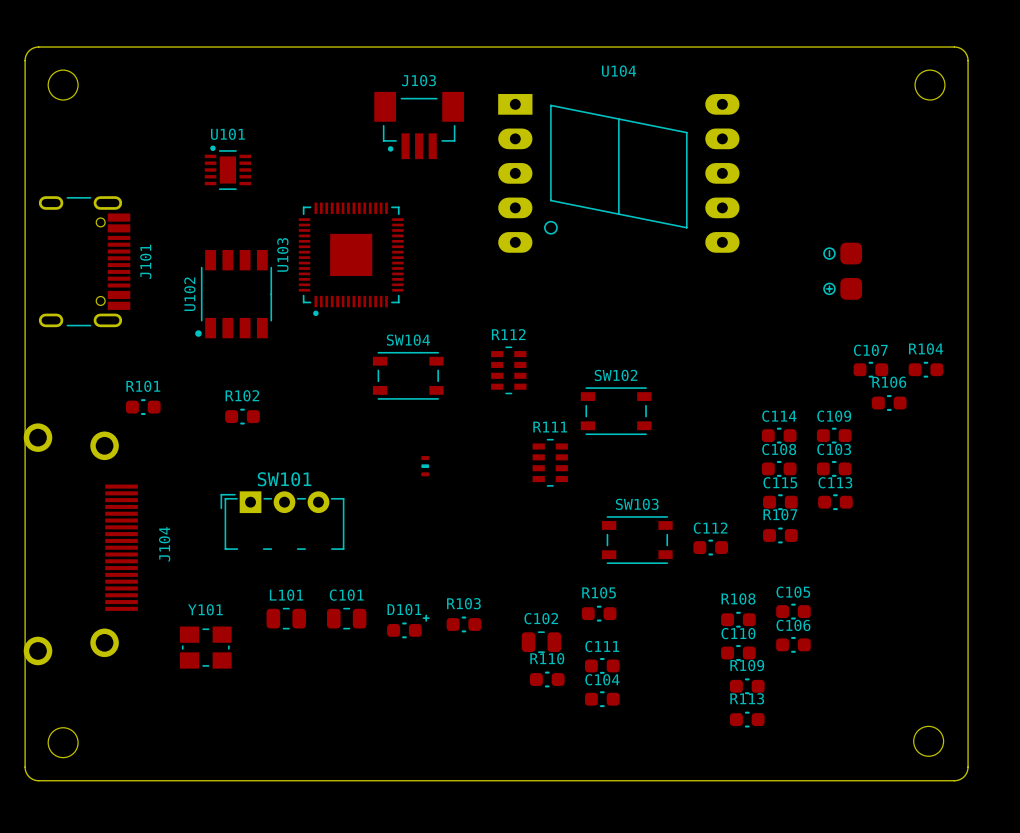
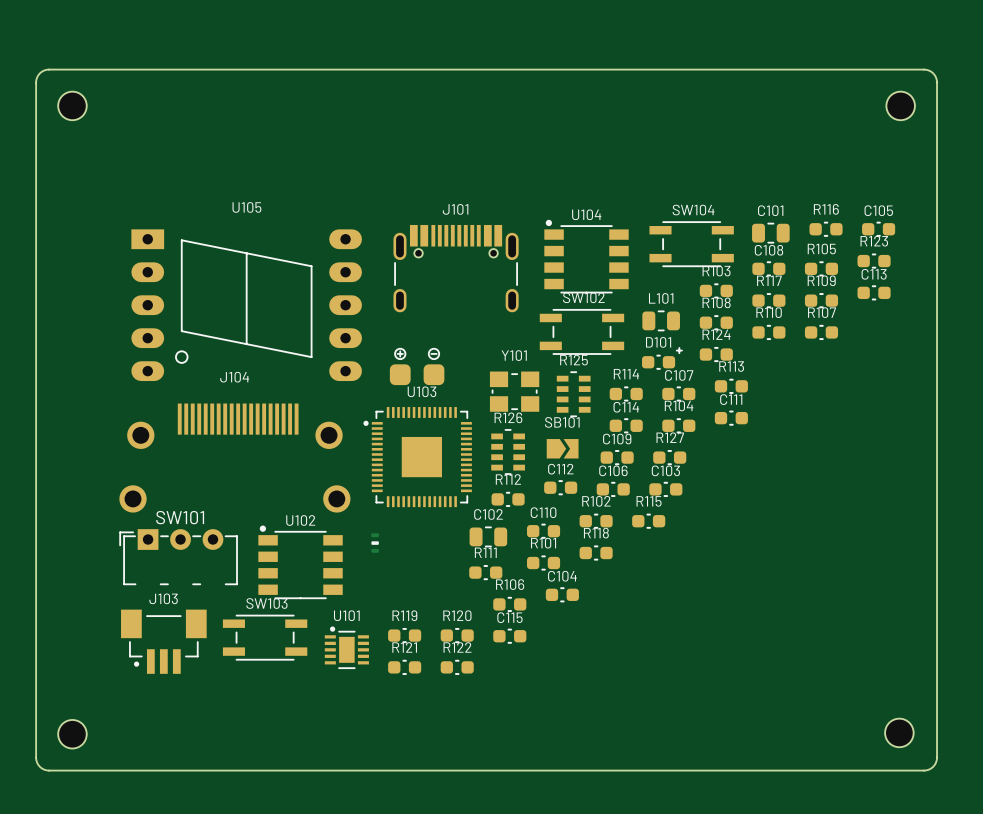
U104 name position: U104 (619, 71) -> U104 (586, 214)
U104 footprint: [498, 94, 740, 253] -> [544, 219, 629, 294]
J103 position: (419, 125) -> (163, 641)
U101 position: (227, 167) -> (346, 647)
R116: none -> (826, 229)
R123: none -> (874, 261)
U103 rotation: 0° (351, 259) -> 90° clockwise (417, 457)
U103 position: (351, 259) -> (417, 457)
J101 rotation: 0° (84, 261) -> 90° counterclockwise (456, 268)
J101 position: (84, 261) -> (456, 268)
part: (842, 271) -> none
R117: none -> (768, 300)
U105: none -> (246, 305)
U102 rotation: 0° (233, 294) -> 90° clockwise (300, 562)
U102 position: (233, 294) -> (300, 562)
R124: none -> (716, 354)
R112 footprint: [491, 346, 527, 395] -> [491, 491, 525, 507]
SW104 footprint: [372, 351, 444, 400] -> [649, 221, 734, 268]
part: none -> (417, 366)
C107 position: (870, 369) -> (678, 393)
R104 position: (925, 369) -> (678, 425)
R125: none -> (573, 394)
R114: none -> (626, 393)
SW102 footprint: [580, 387, 652, 436] -> [539, 309, 625, 355]
R106 position: (889, 403) -> (509, 604)
R101 position: (143, 407) -> (543, 563)
R102 position: (242, 416) -> (596, 521)
C114 position: (779, 435) -> (626, 425)
C109 position: (834, 435) -> (617, 457)
R111 footprint: [532, 438, 568, 487] -> [469, 565, 503, 581]
SB101: none -> (562, 448)
R126: none -> (508, 452)
R127: none -> (669, 457)
drawing position: (425, 466) -> (375, 543)
C108 position: (779, 468) -> (768, 268)
C103 position: (834, 468) -> (665, 489)
C115 position: (780, 502) -> (509, 636)
C113 position: (835, 502) -> (874, 292)
SW103 footprint: [602, 516, 673, 564] -> [222, 614, 308, 661]
R115: none -> (648, 521)
SW101 position: (282, 520) -> (178, 557)
R107 position: (780, 535) -> (821, 332)
J104 rotation: 0° (80, 544) -> 90° counterclockwise (234, 458)
J104 position: (80, 544) -> (234, 458)
C112 position: (710, 547) -> (560, 487)
R118: none -> (596, 553)
C105 position: (793, 611) -> (878, 229)
R105 position: (599, 613) -> (821, 268)
L101 position: (286, 618) -> (661, 320)
C101 position: (346, 618) -> (770, 233)
R108 position: (738, 619) -> (716, 322)
R103 position: (463, 624) -> (716, 290)
D101 position: (408, 626) -> (662, 358)
R119: none -> (404, 635)
R120: none -> (457, 635)
C102 position: (541, 642) -> (488, 536)
C106 position: (793, 644) -> (613, 489)
Y101 position: (205, 647) -> (514, 391)
C110 position: (738, 653) -> (543, 531)
C111 position: (602, 665) -> (731, 418)
R121: none -> (404, 667)
R122: none -> (457, 667)
R110 position: (547, 679) -> (768, 332)
R109 position: (747, 686) -> (821, 300)
C104 position: (602, 699) -> (562, 594)
R113 position: (747, 719) -> (731, 386)

